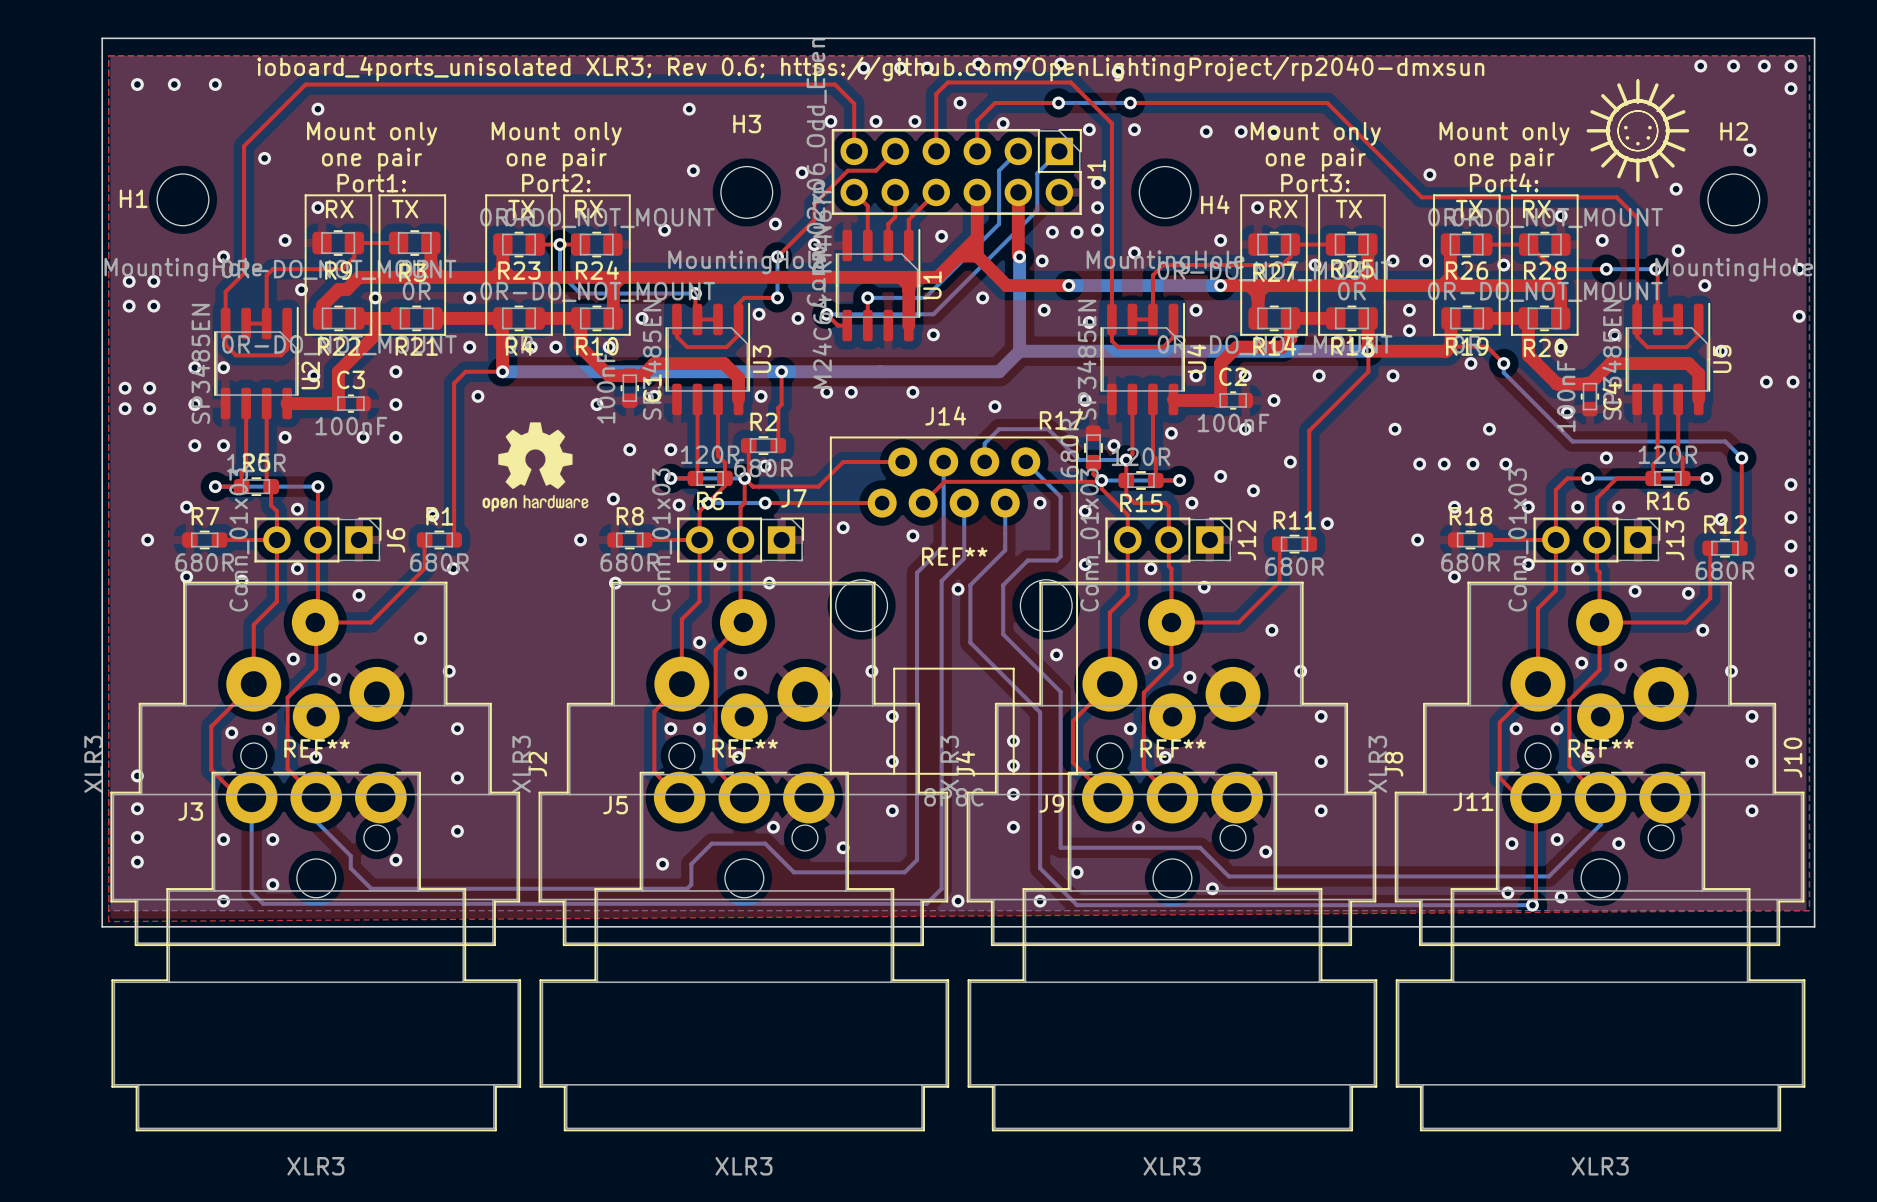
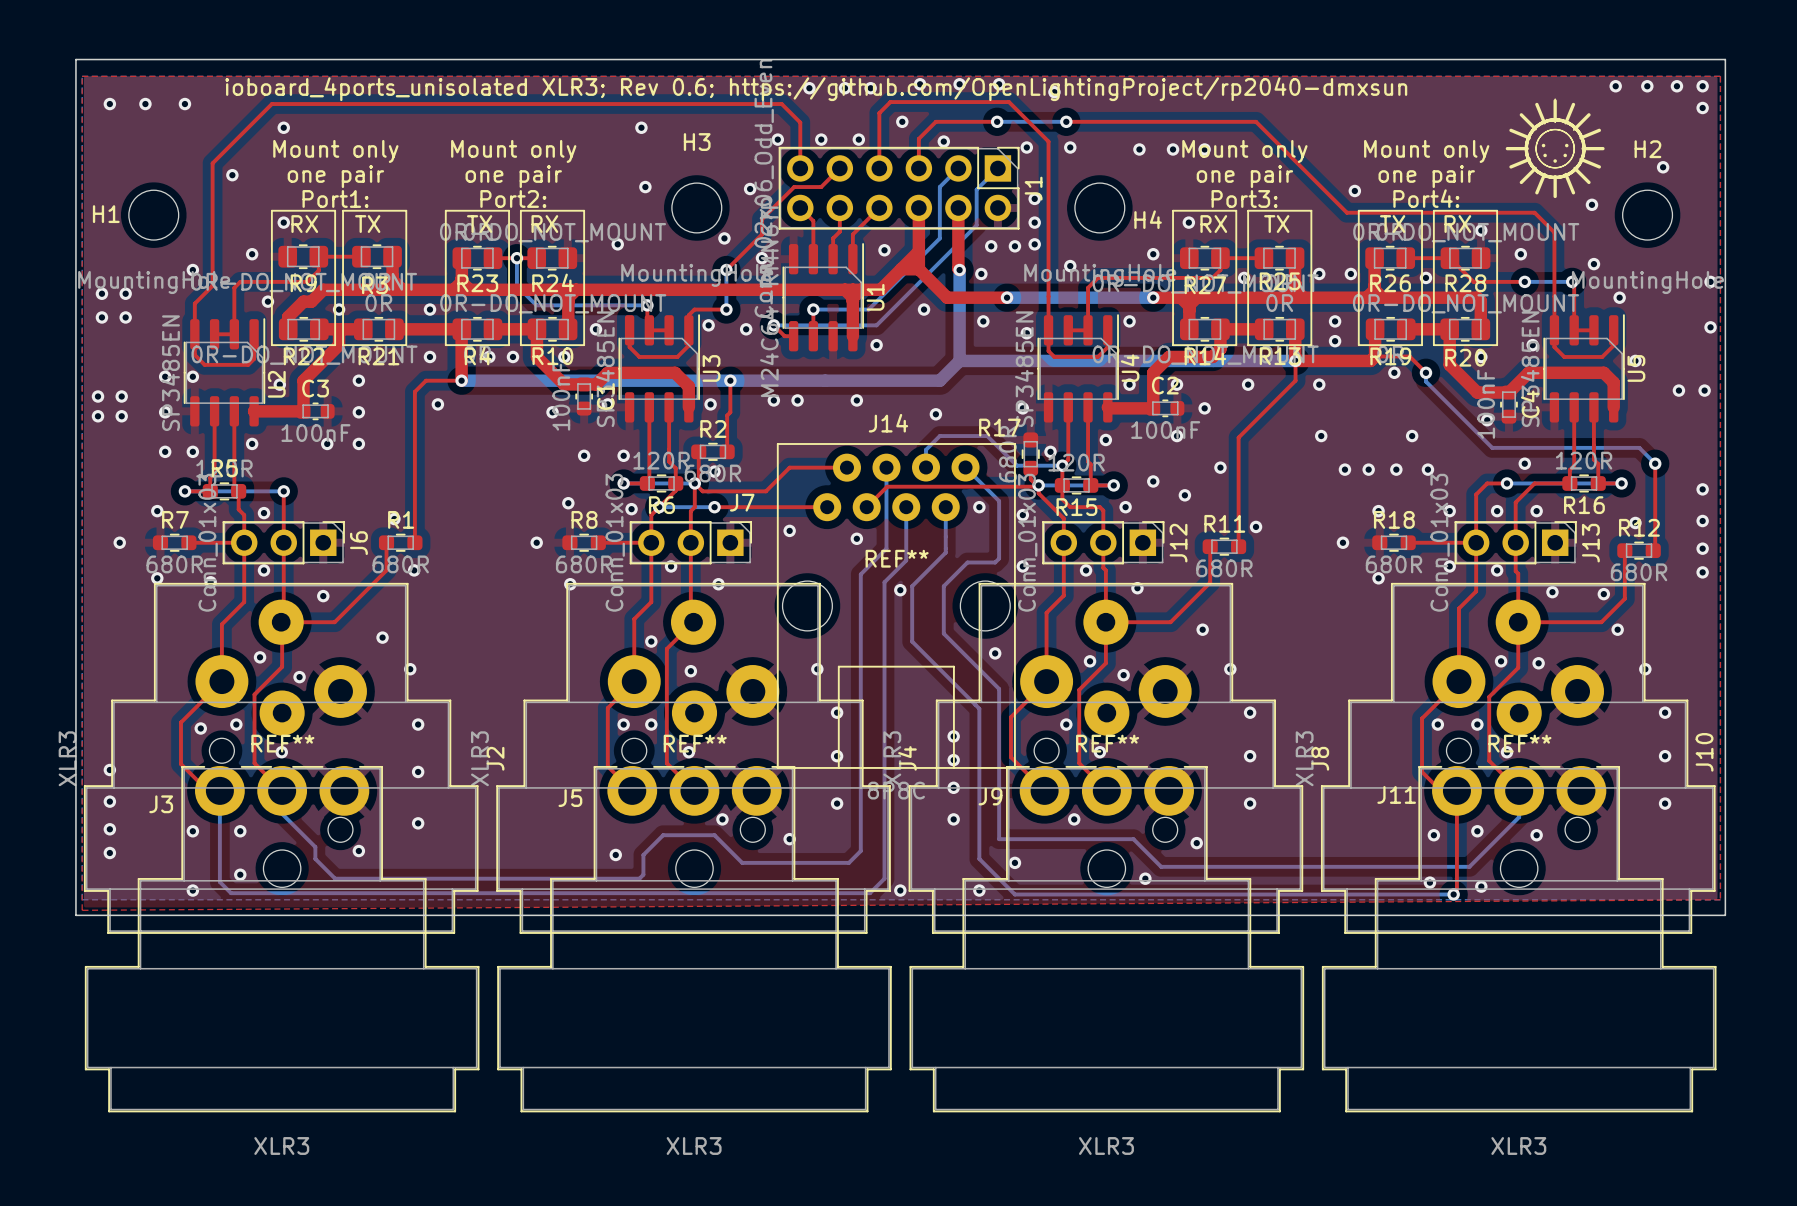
drawing: [482, 422, 589, 512] -> none

